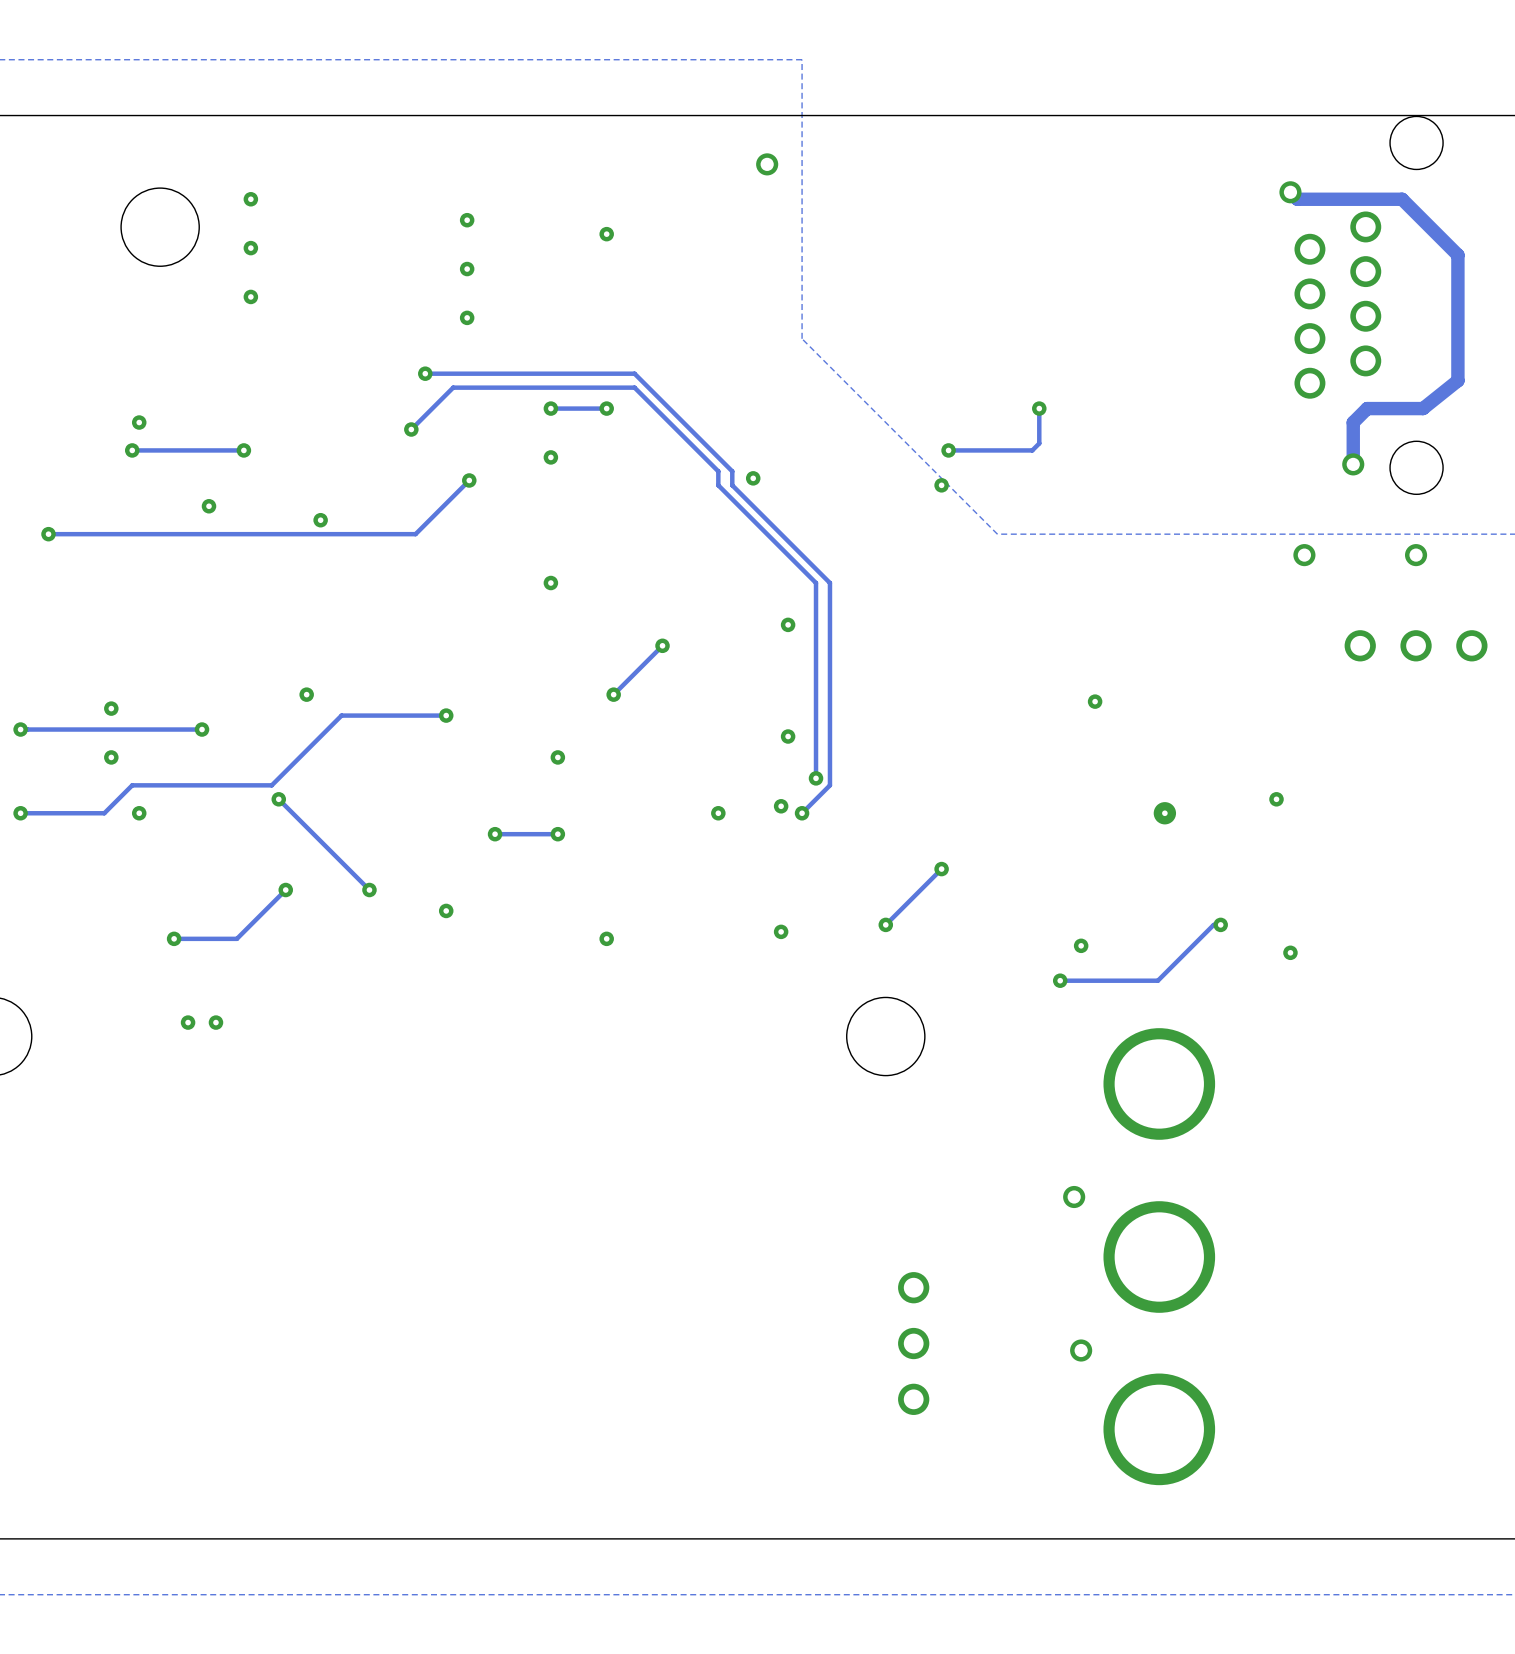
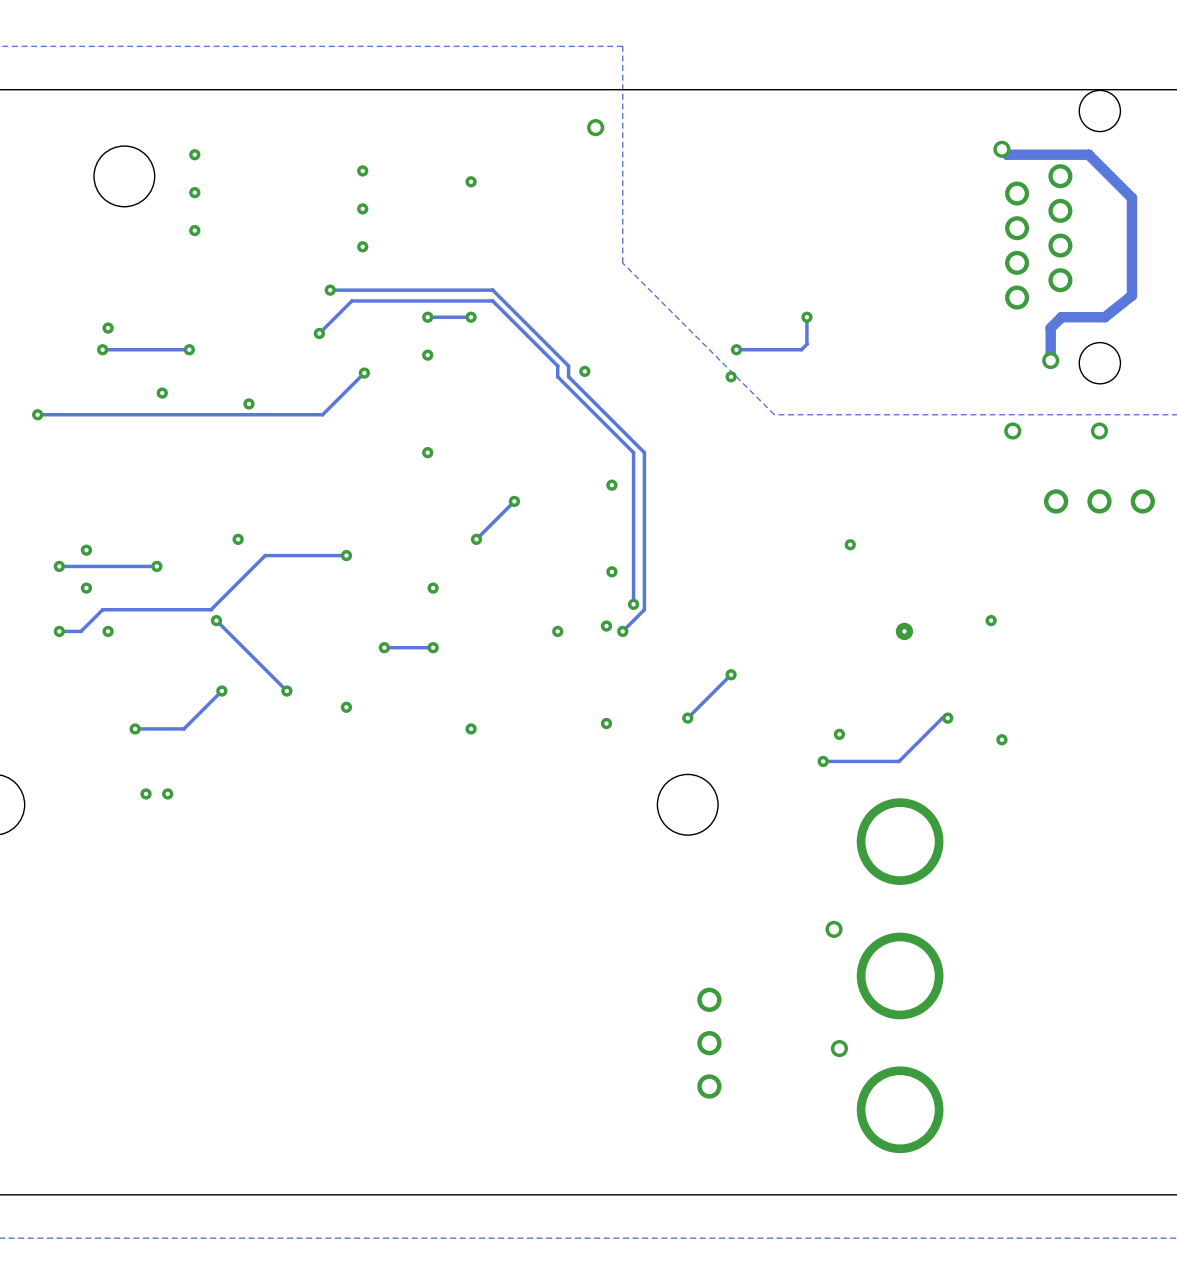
via: (20, 729) -> none
track: (76, 729) (20, 729) -> none
via: none -> (59, 566)
via: (20, 813) -> none
track: (76, 813) (20, 813) -> none
via: none -> (59, 631)

